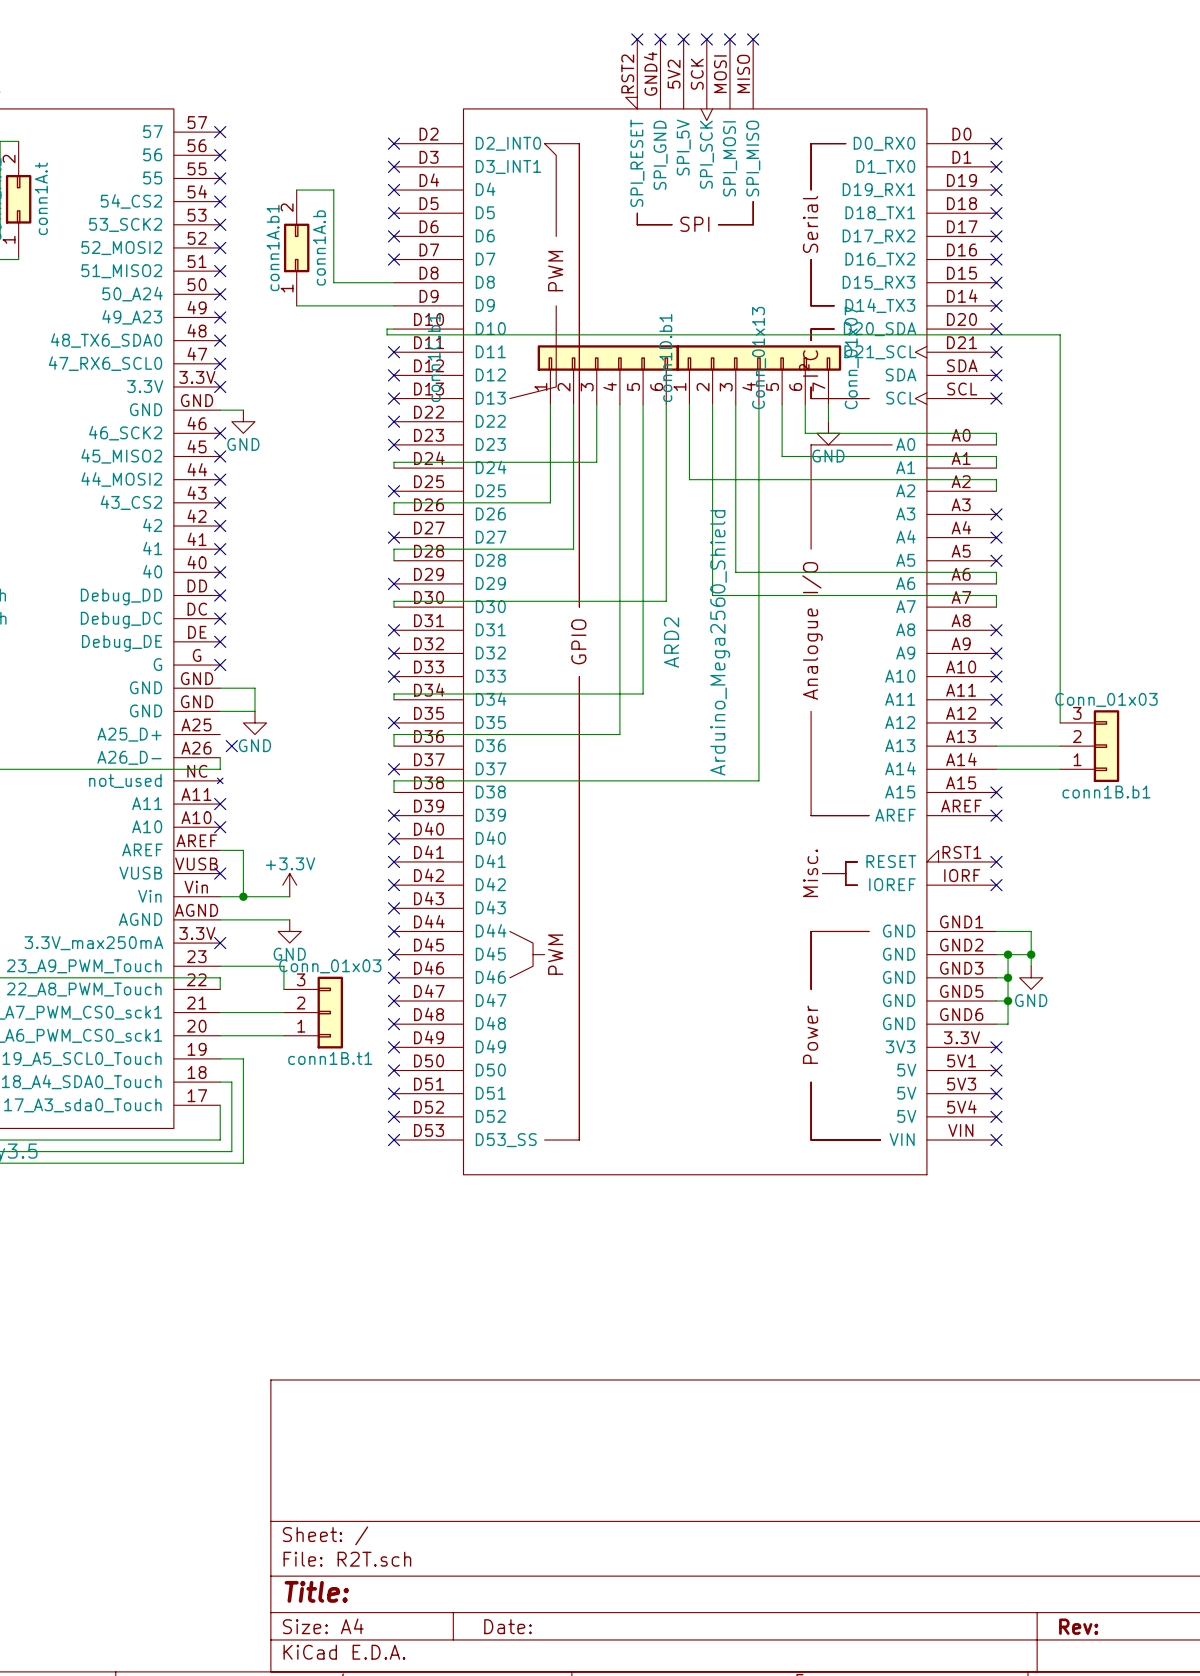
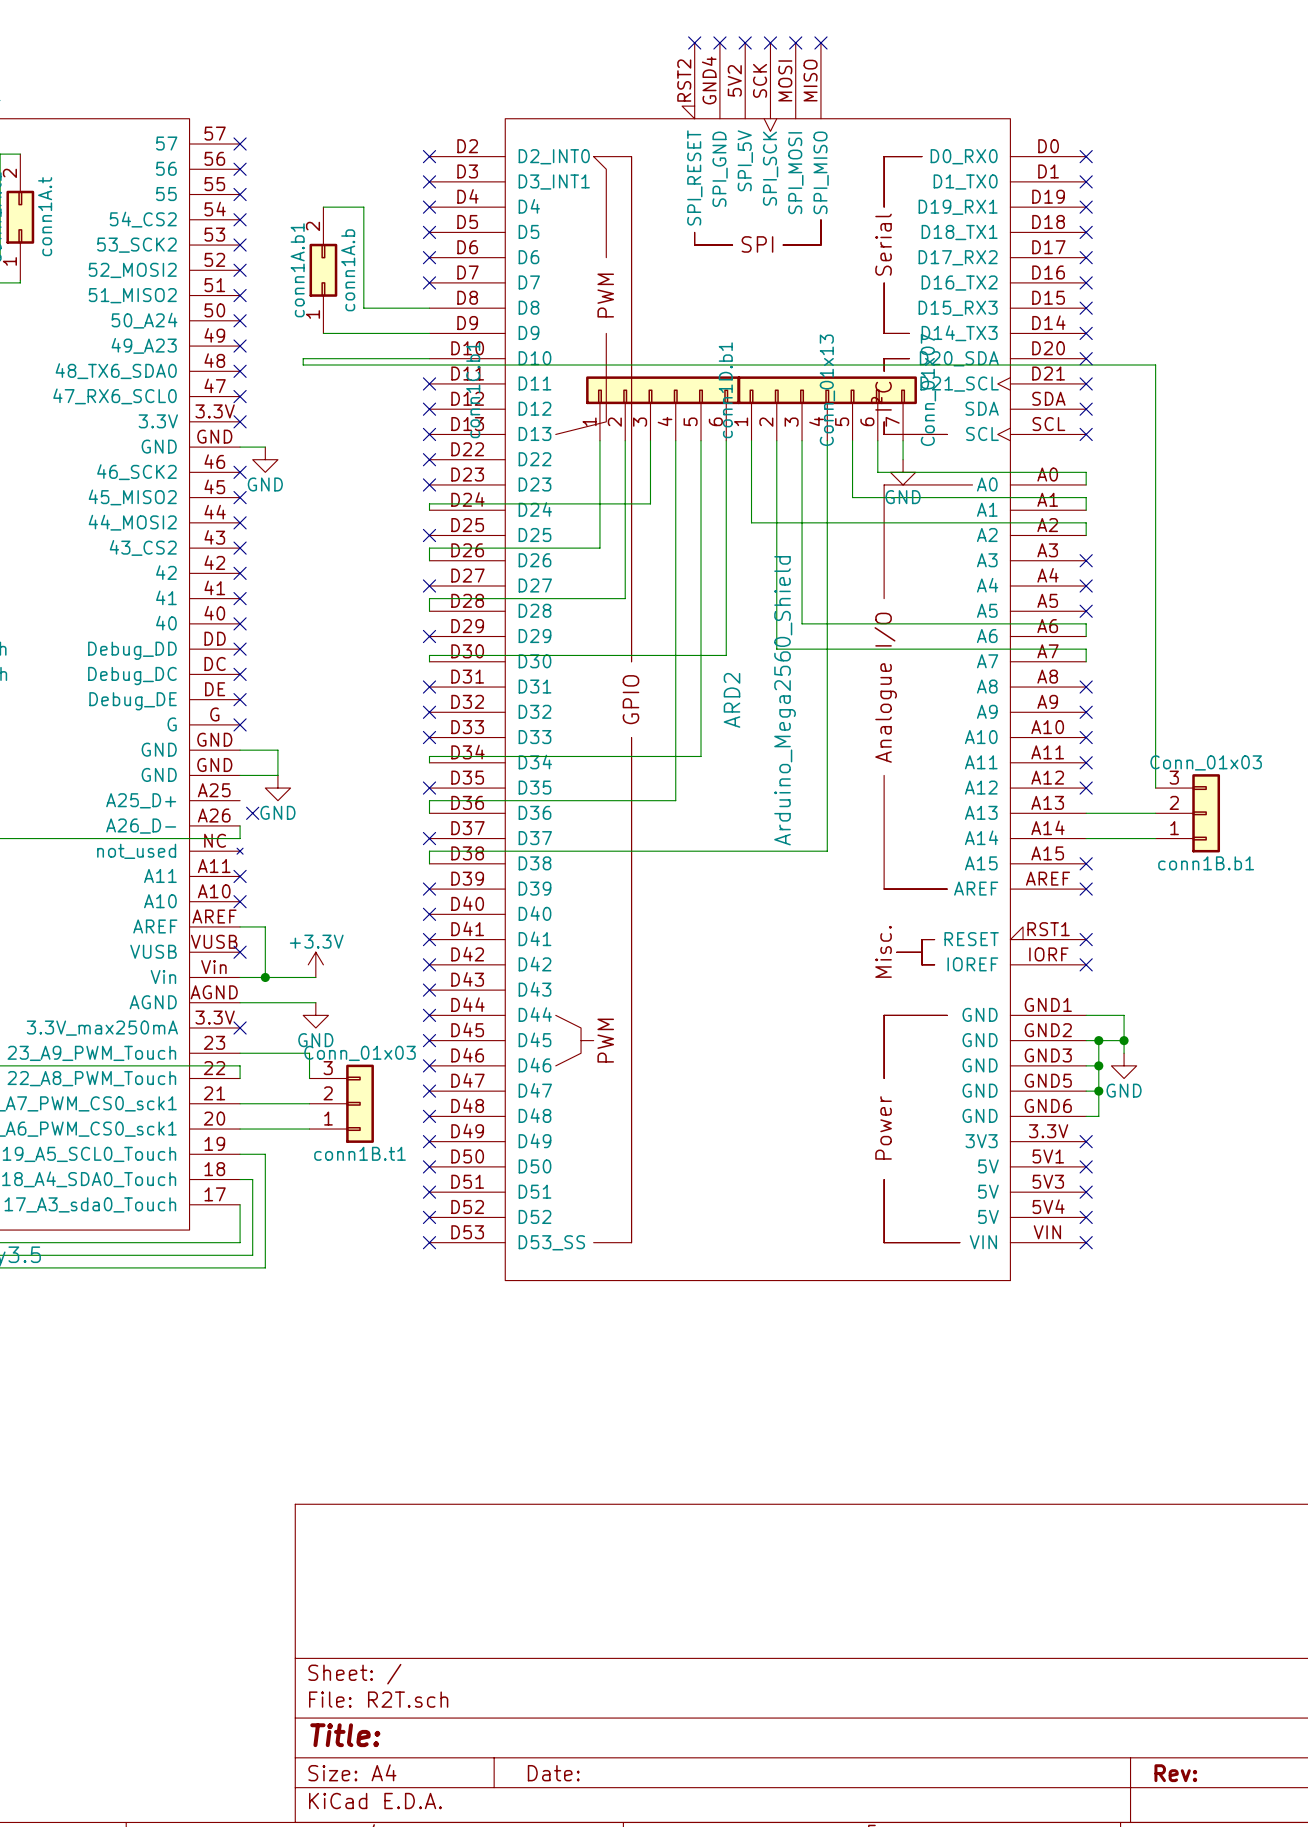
wire: (387, 329) (387, 334) -> (421, 358) (303, 358) (303, 364) (421, 364)

